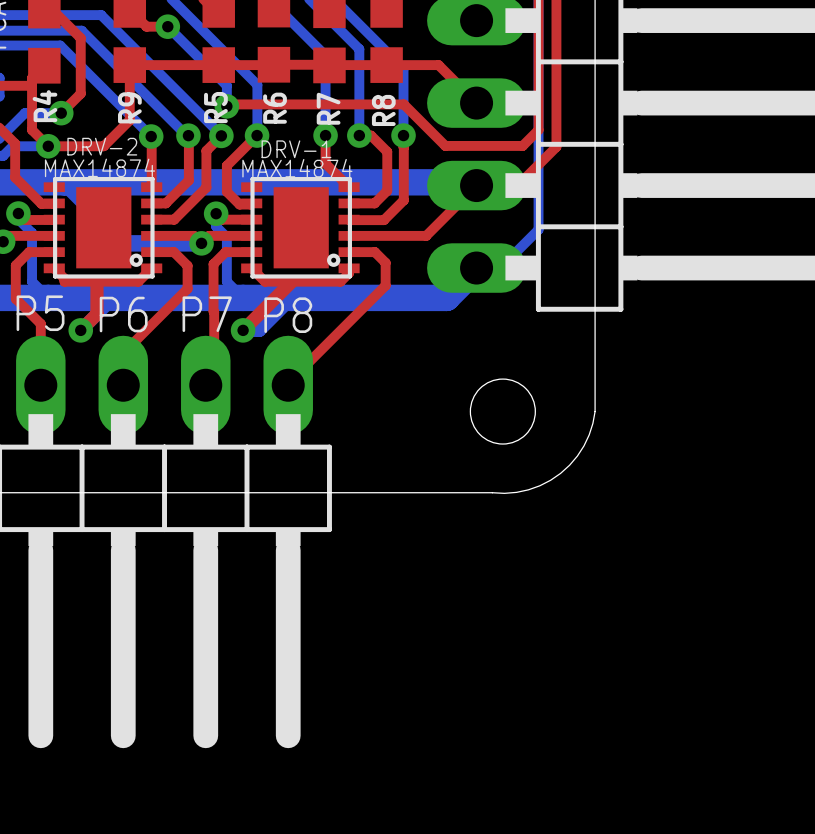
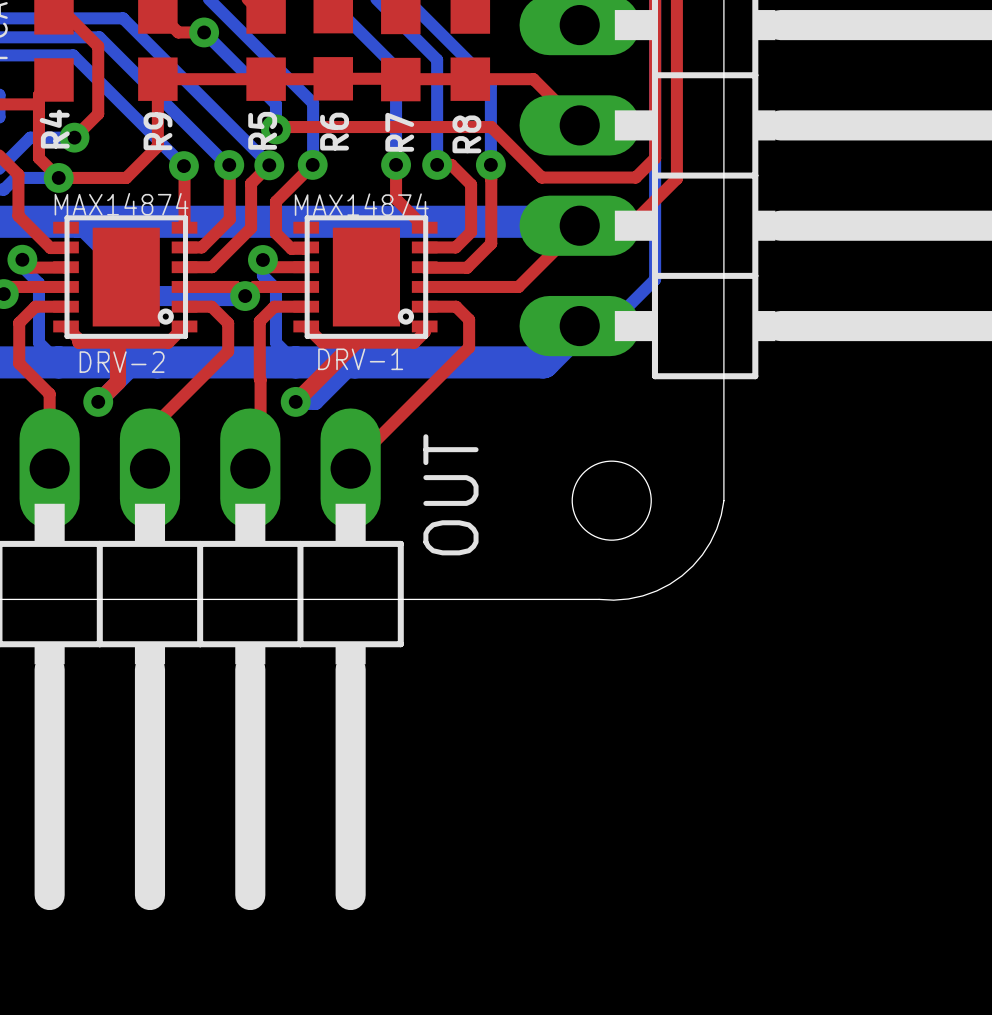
DRV-2 name position: DRV-2 (102, 146) -> DRV-2 (122, 362)
DRV-1 name position: DRV-1 (296, 149) -> DRV-1 (360, 359)
text: P5 (40, 313) -> none
text: P6 (123, 314) -> none
text: P7 (207, 314) -> none
text: P8 (288, 315) -> none
OUT name: none -> OUT (450, 494)

